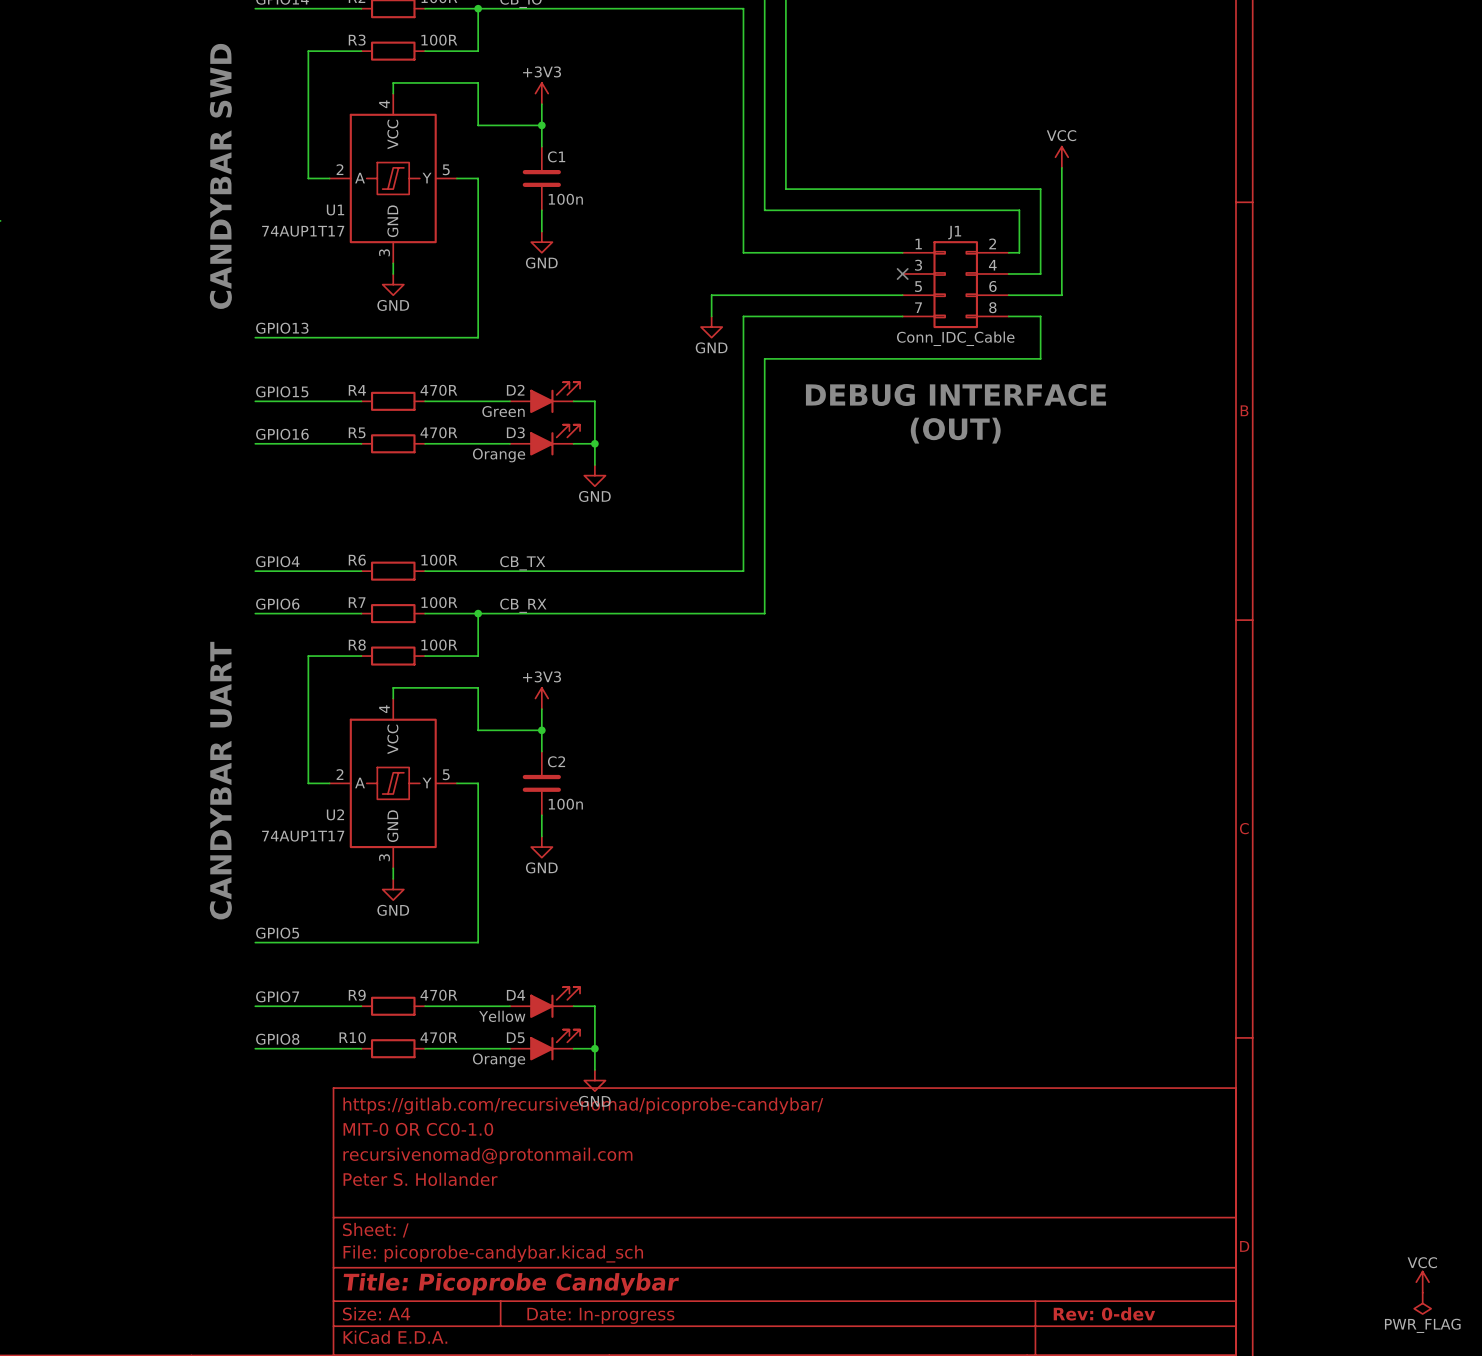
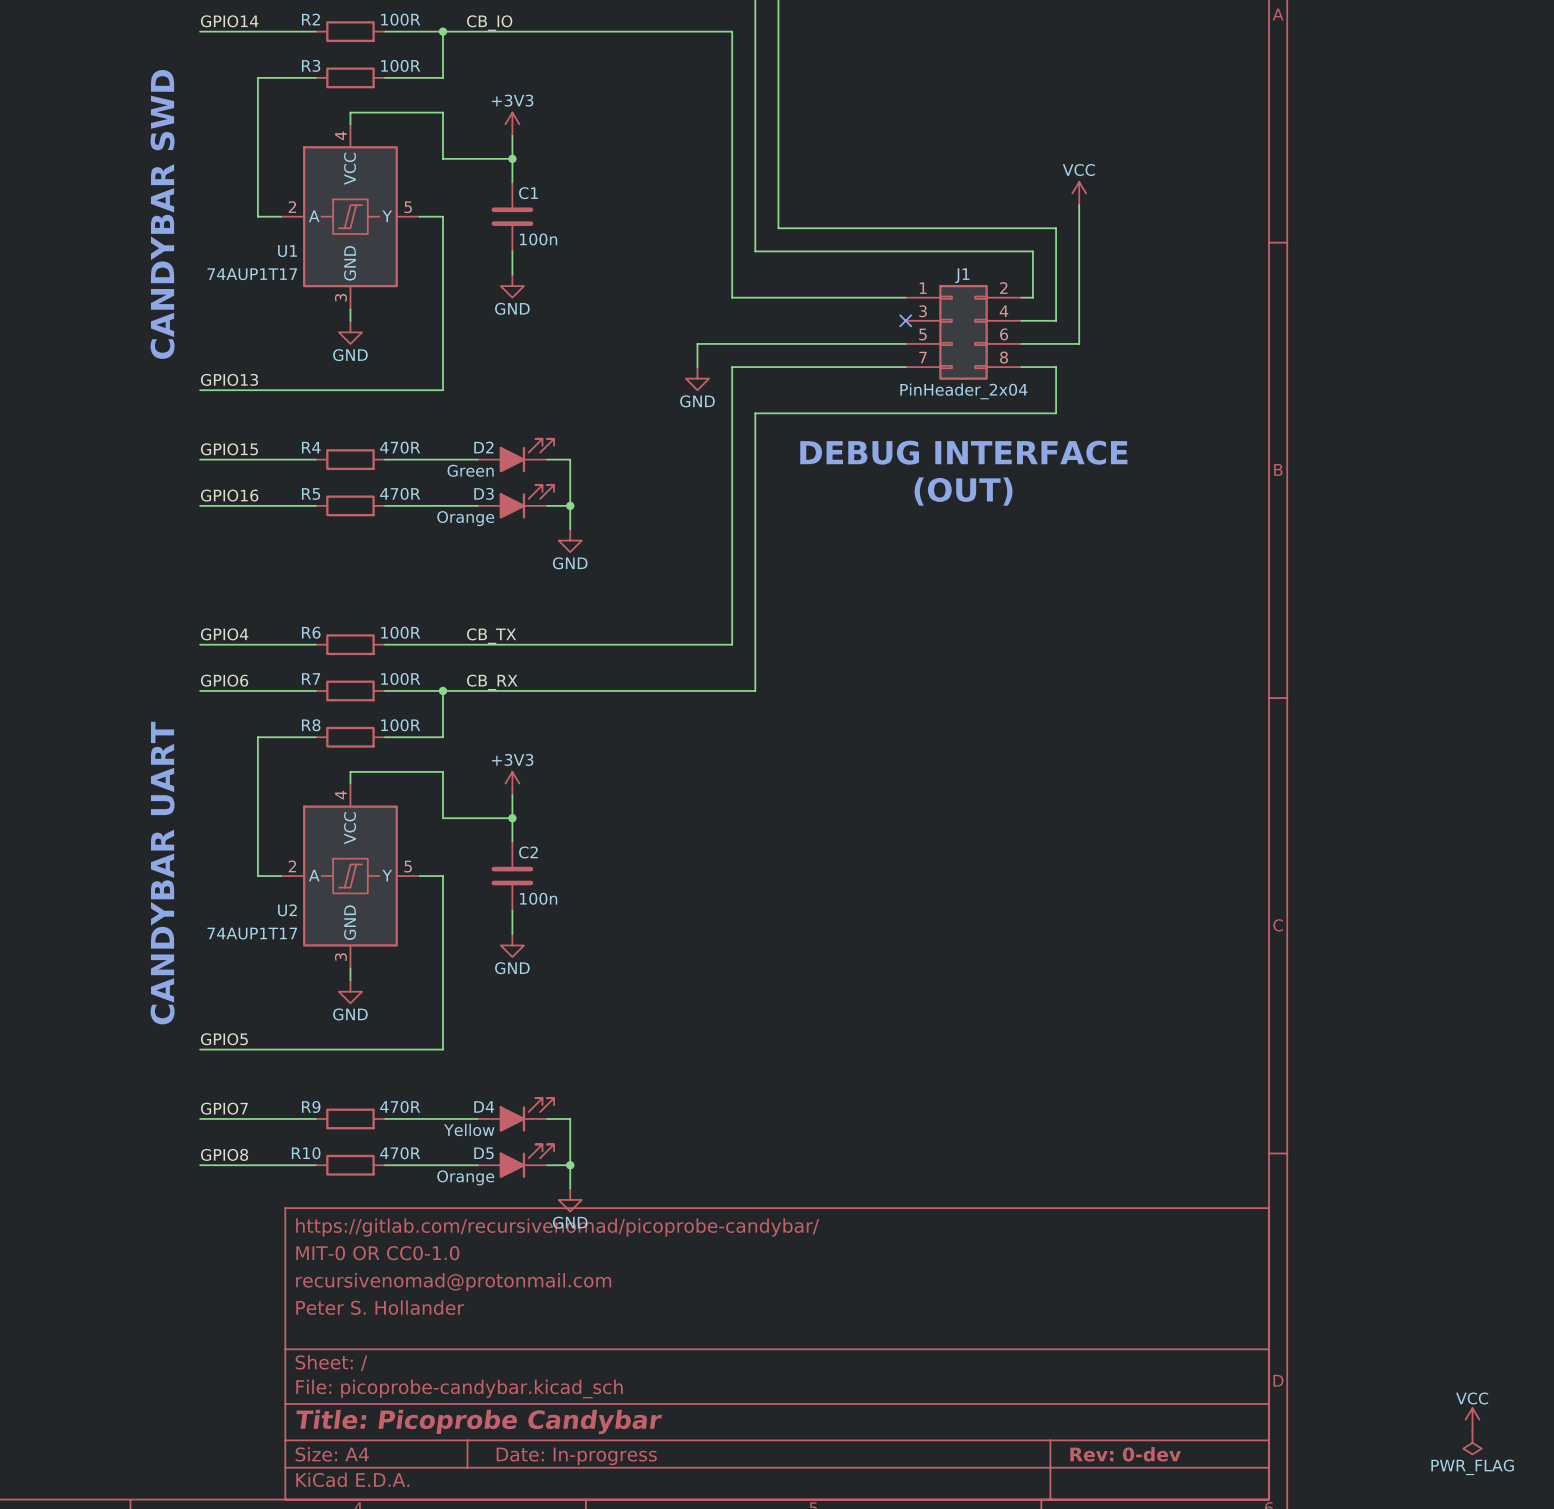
J1 value: Conn_IDC_Cable (955, 338) -> PinHeader_2x04 (963, 391)

